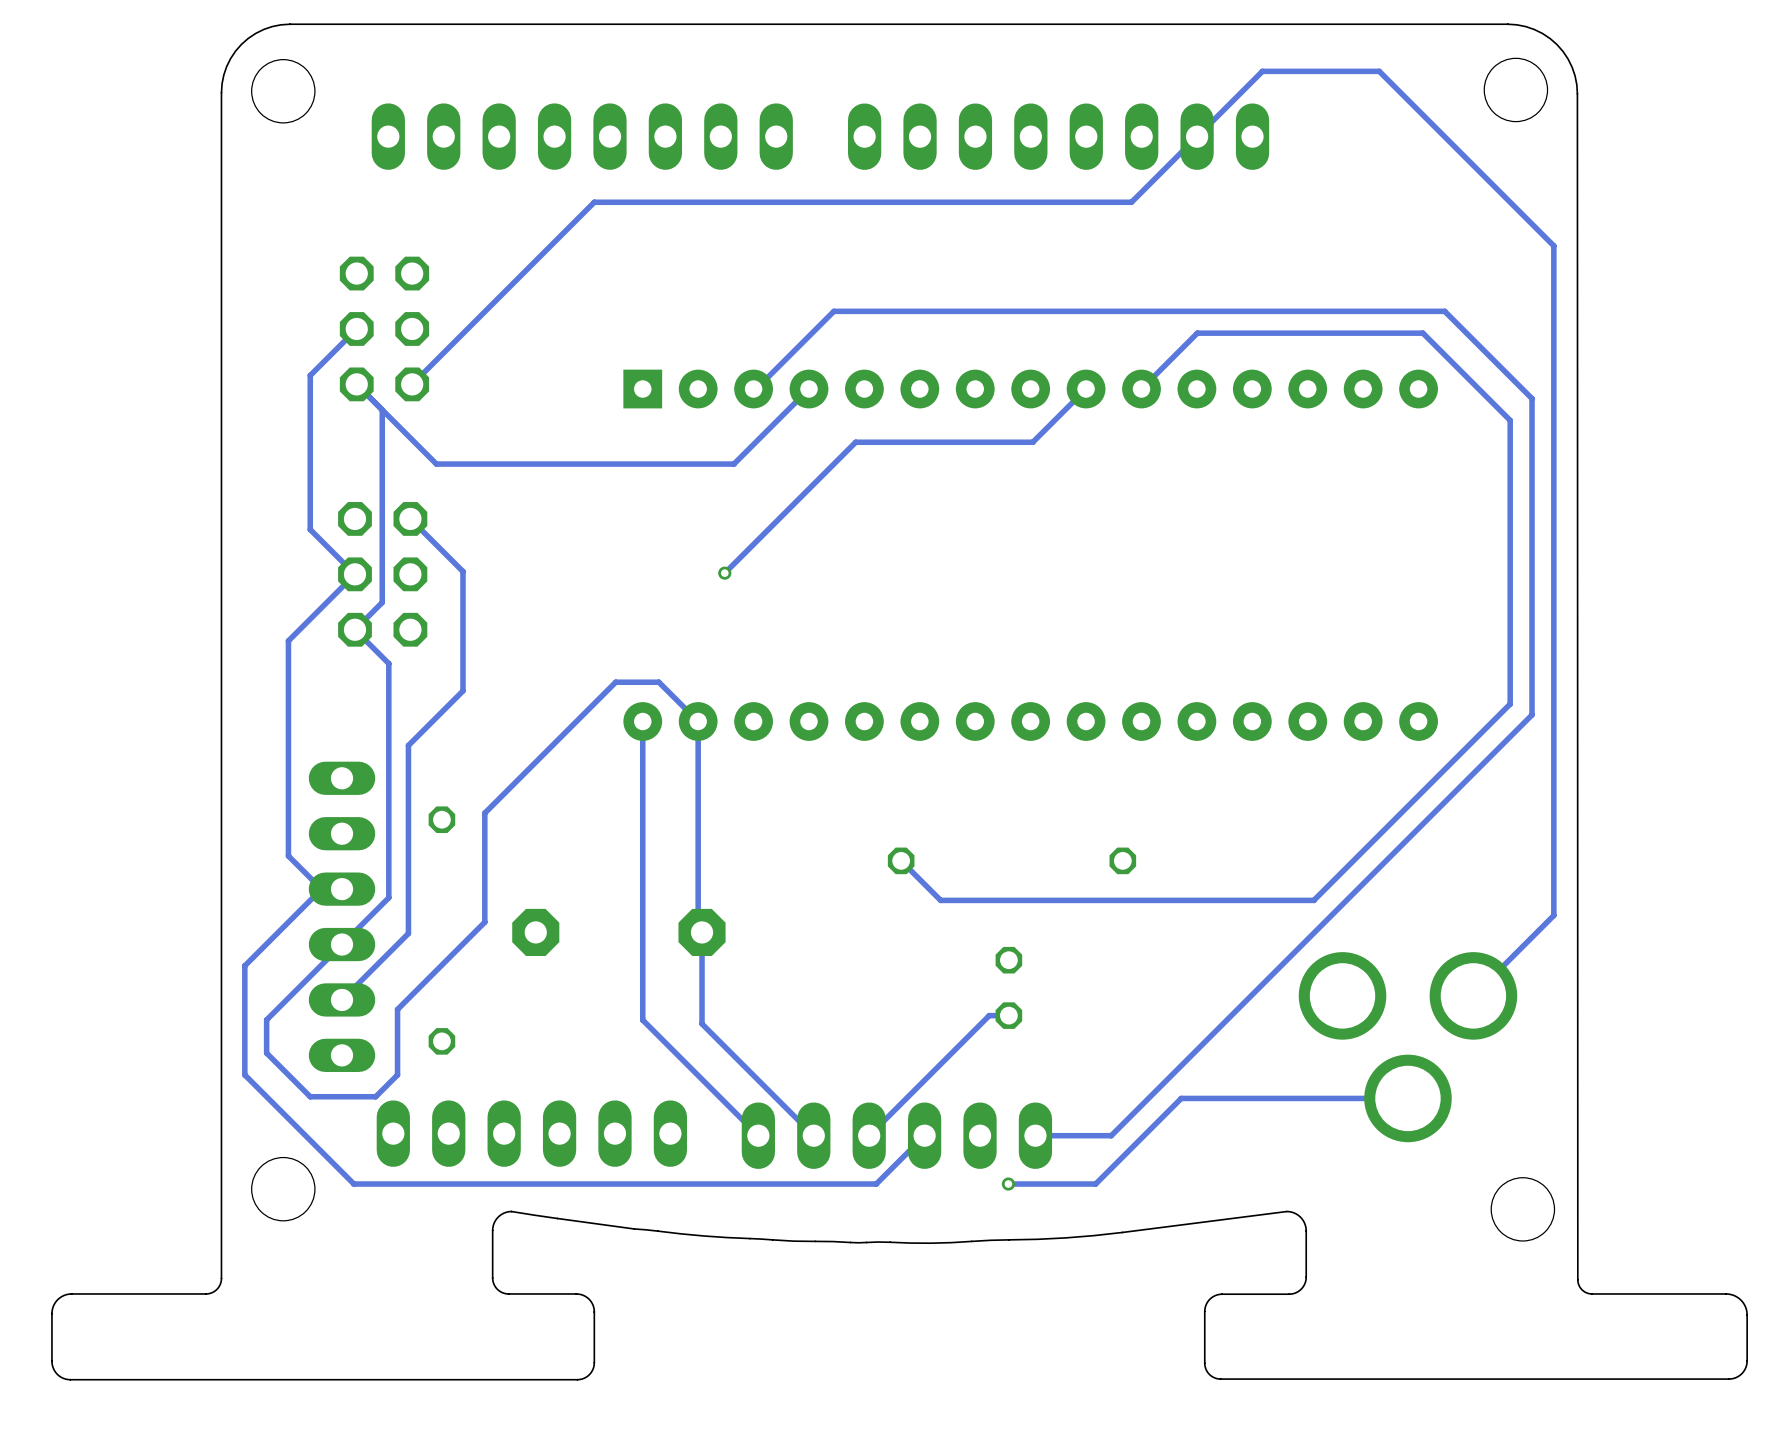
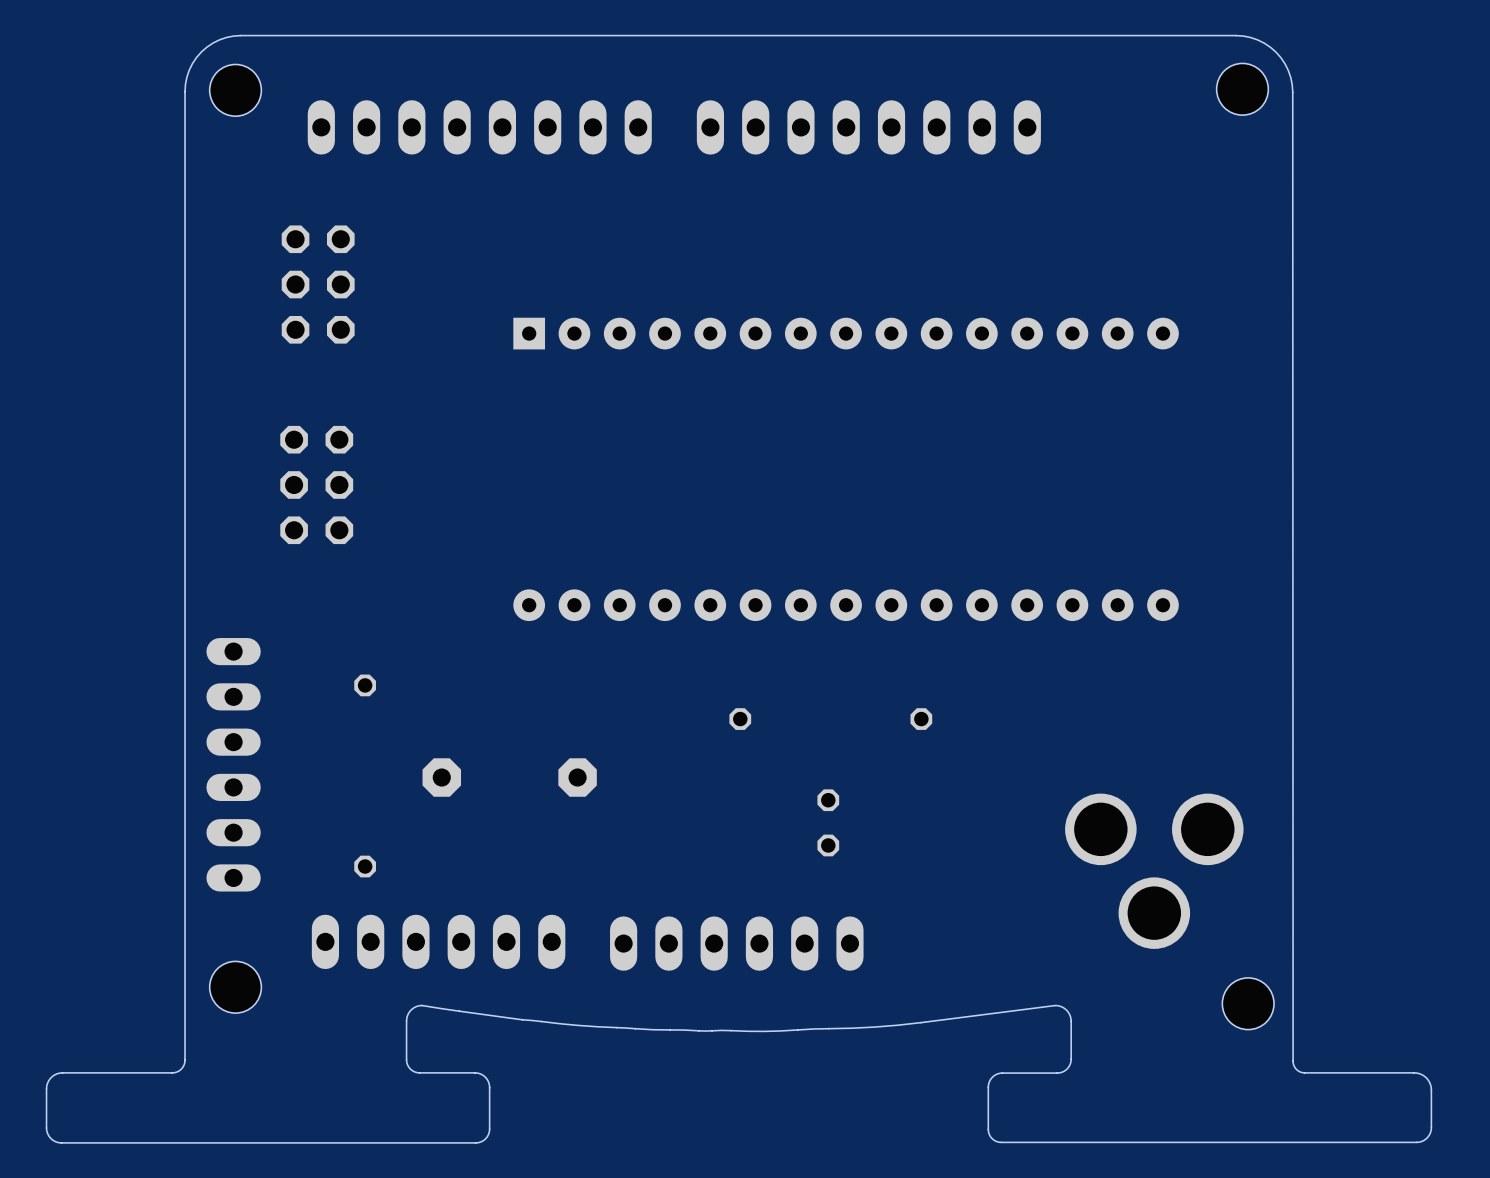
track: (356, 328) (310, 375) (310, 529) (354, 574) (288, 640) (288, 856) (321, 889) -> none
track: (356, 384) (436, 464) (733, 464) (809, 389) -> none
track: (412, 384) (594, 202) (1131, 202) (1262, 71) (1379, 71) (1553, 245) (1553, 915) (1473, 995) -> none
track: (753, 389) (756, 389) (833, 311) (1444, 311) (1532, 398) (1532, 714) (1111, 1135) (1035, 1135) -> none
track: (1086, 389) (1032, 442) (855, 442) (724, 573) -> none
track: (1141, 389) (1197, 333) (1422, 333) (1510, 420) (1510, 704) (1313, 900) (940, 900) (901, 860) -> none
track: (382, 409) (382, 602) (354, 629) (388, 663) (388, 897) (266, 1019) (266, 1053) (310, 1096) (375, 1096) (397, 1074) (397, 1009) (484, 922) (484, 813) (615, 682) (658, 682) (698, 721) (698, 928) (702, 932) (702, 1023) (813, 1135) -> none
track: (410, 518) (462, 571) (462, 690) (408, 745) (408, 933) (342, 999) -> none
via: (724, 573) -> none
track: (642, 721) (642, 1020) (758, 1135) -> none
track: (321, 889) (244, 965) (244, 1074) (353, 1184) (876, 1184) (924, 1135) -> none
part position: (342, 916) -> (233, 764)
track: (1008, 1015) (989, 1015) (869, 1135) -> none
track: (1407, 1098) (1181, 1098) (1095, 1184) (1008, 1184) -> none
via: (1008, 1184) -> none

